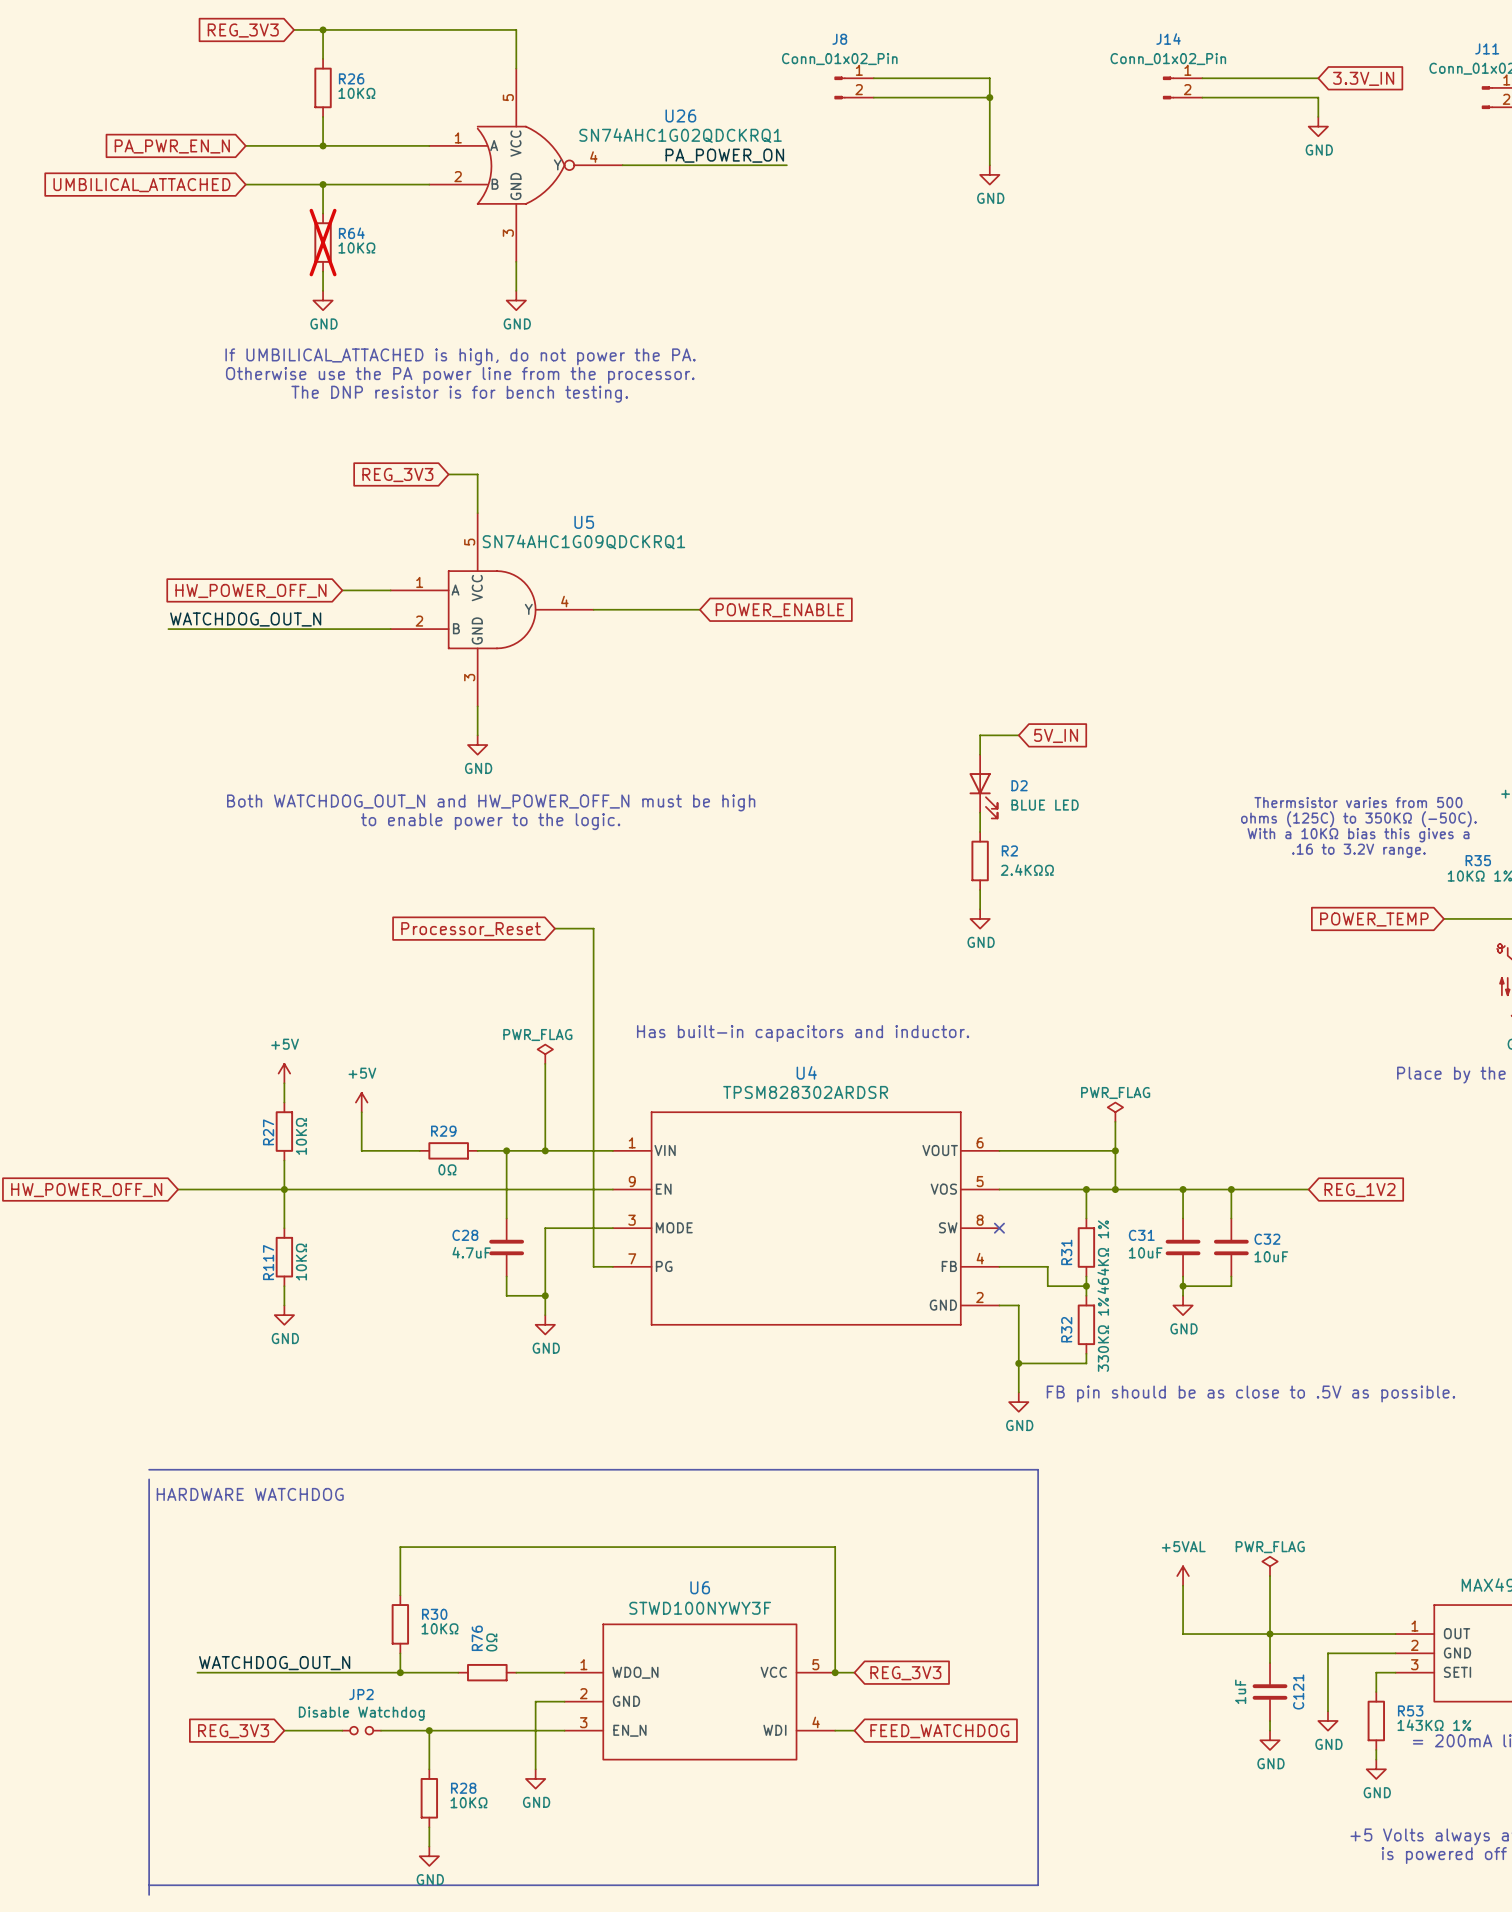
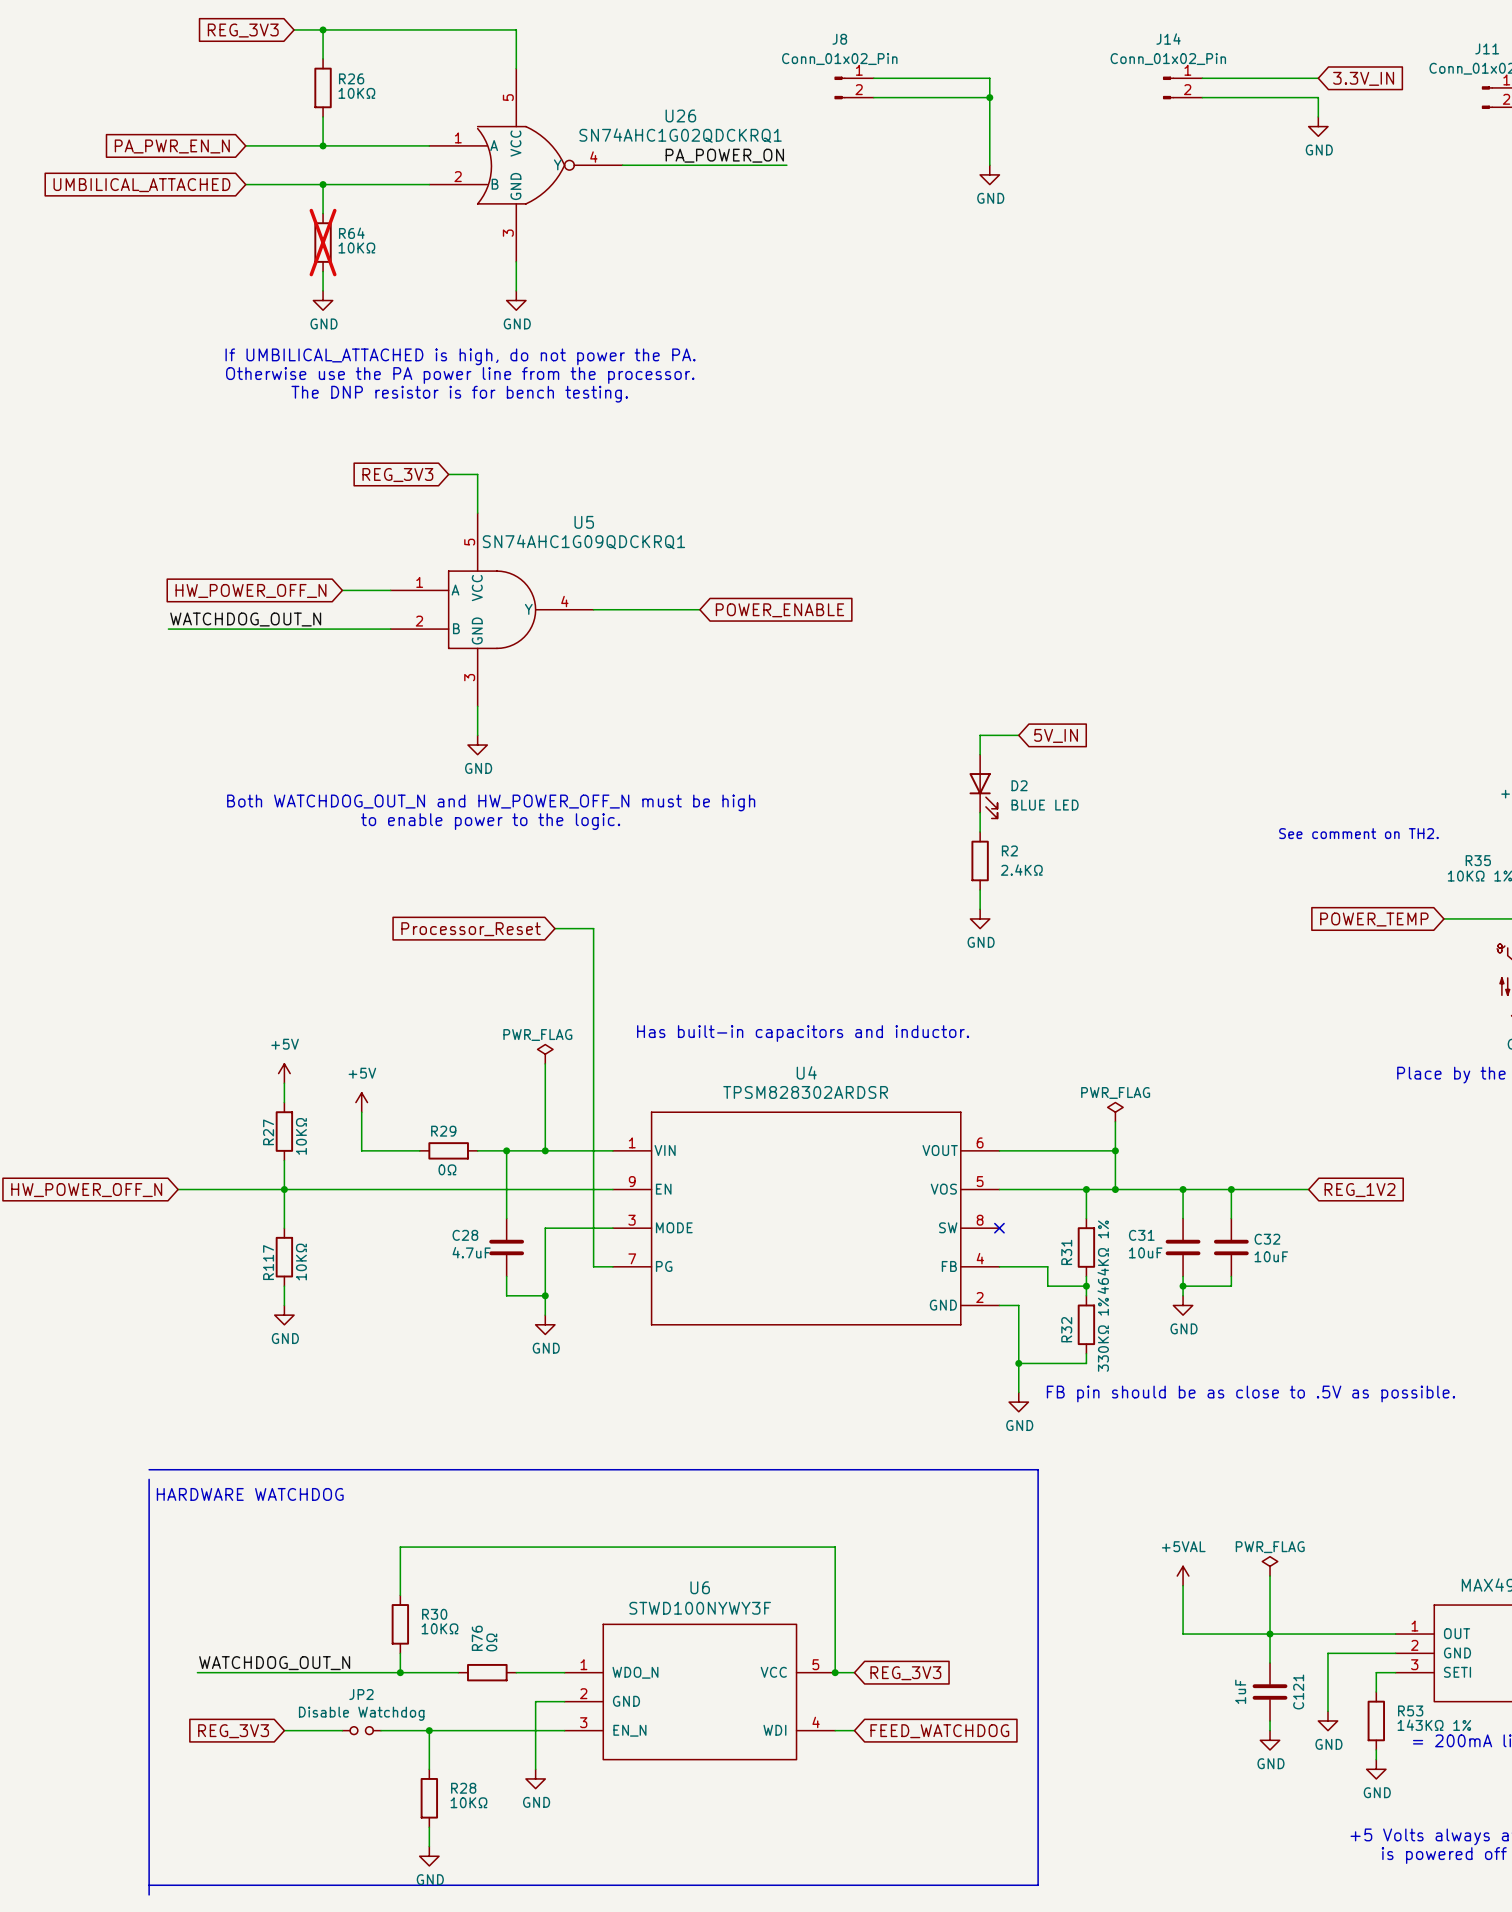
text: Thermsistor varies from 500 (1358, 802) -> none
text: ohms (125C) to 350KΩ (-50C). (1358, 819) -> none
text: With a 10KΩ bias this gives a (1358, 835) -> See comment on TH2. (1358, 833)
text: .16 to 3.2V range. (1358, 850) -> none
R2 value: 2.4KΩΩ (1027, 870) -> 2.4KΩ (1021, 870)

